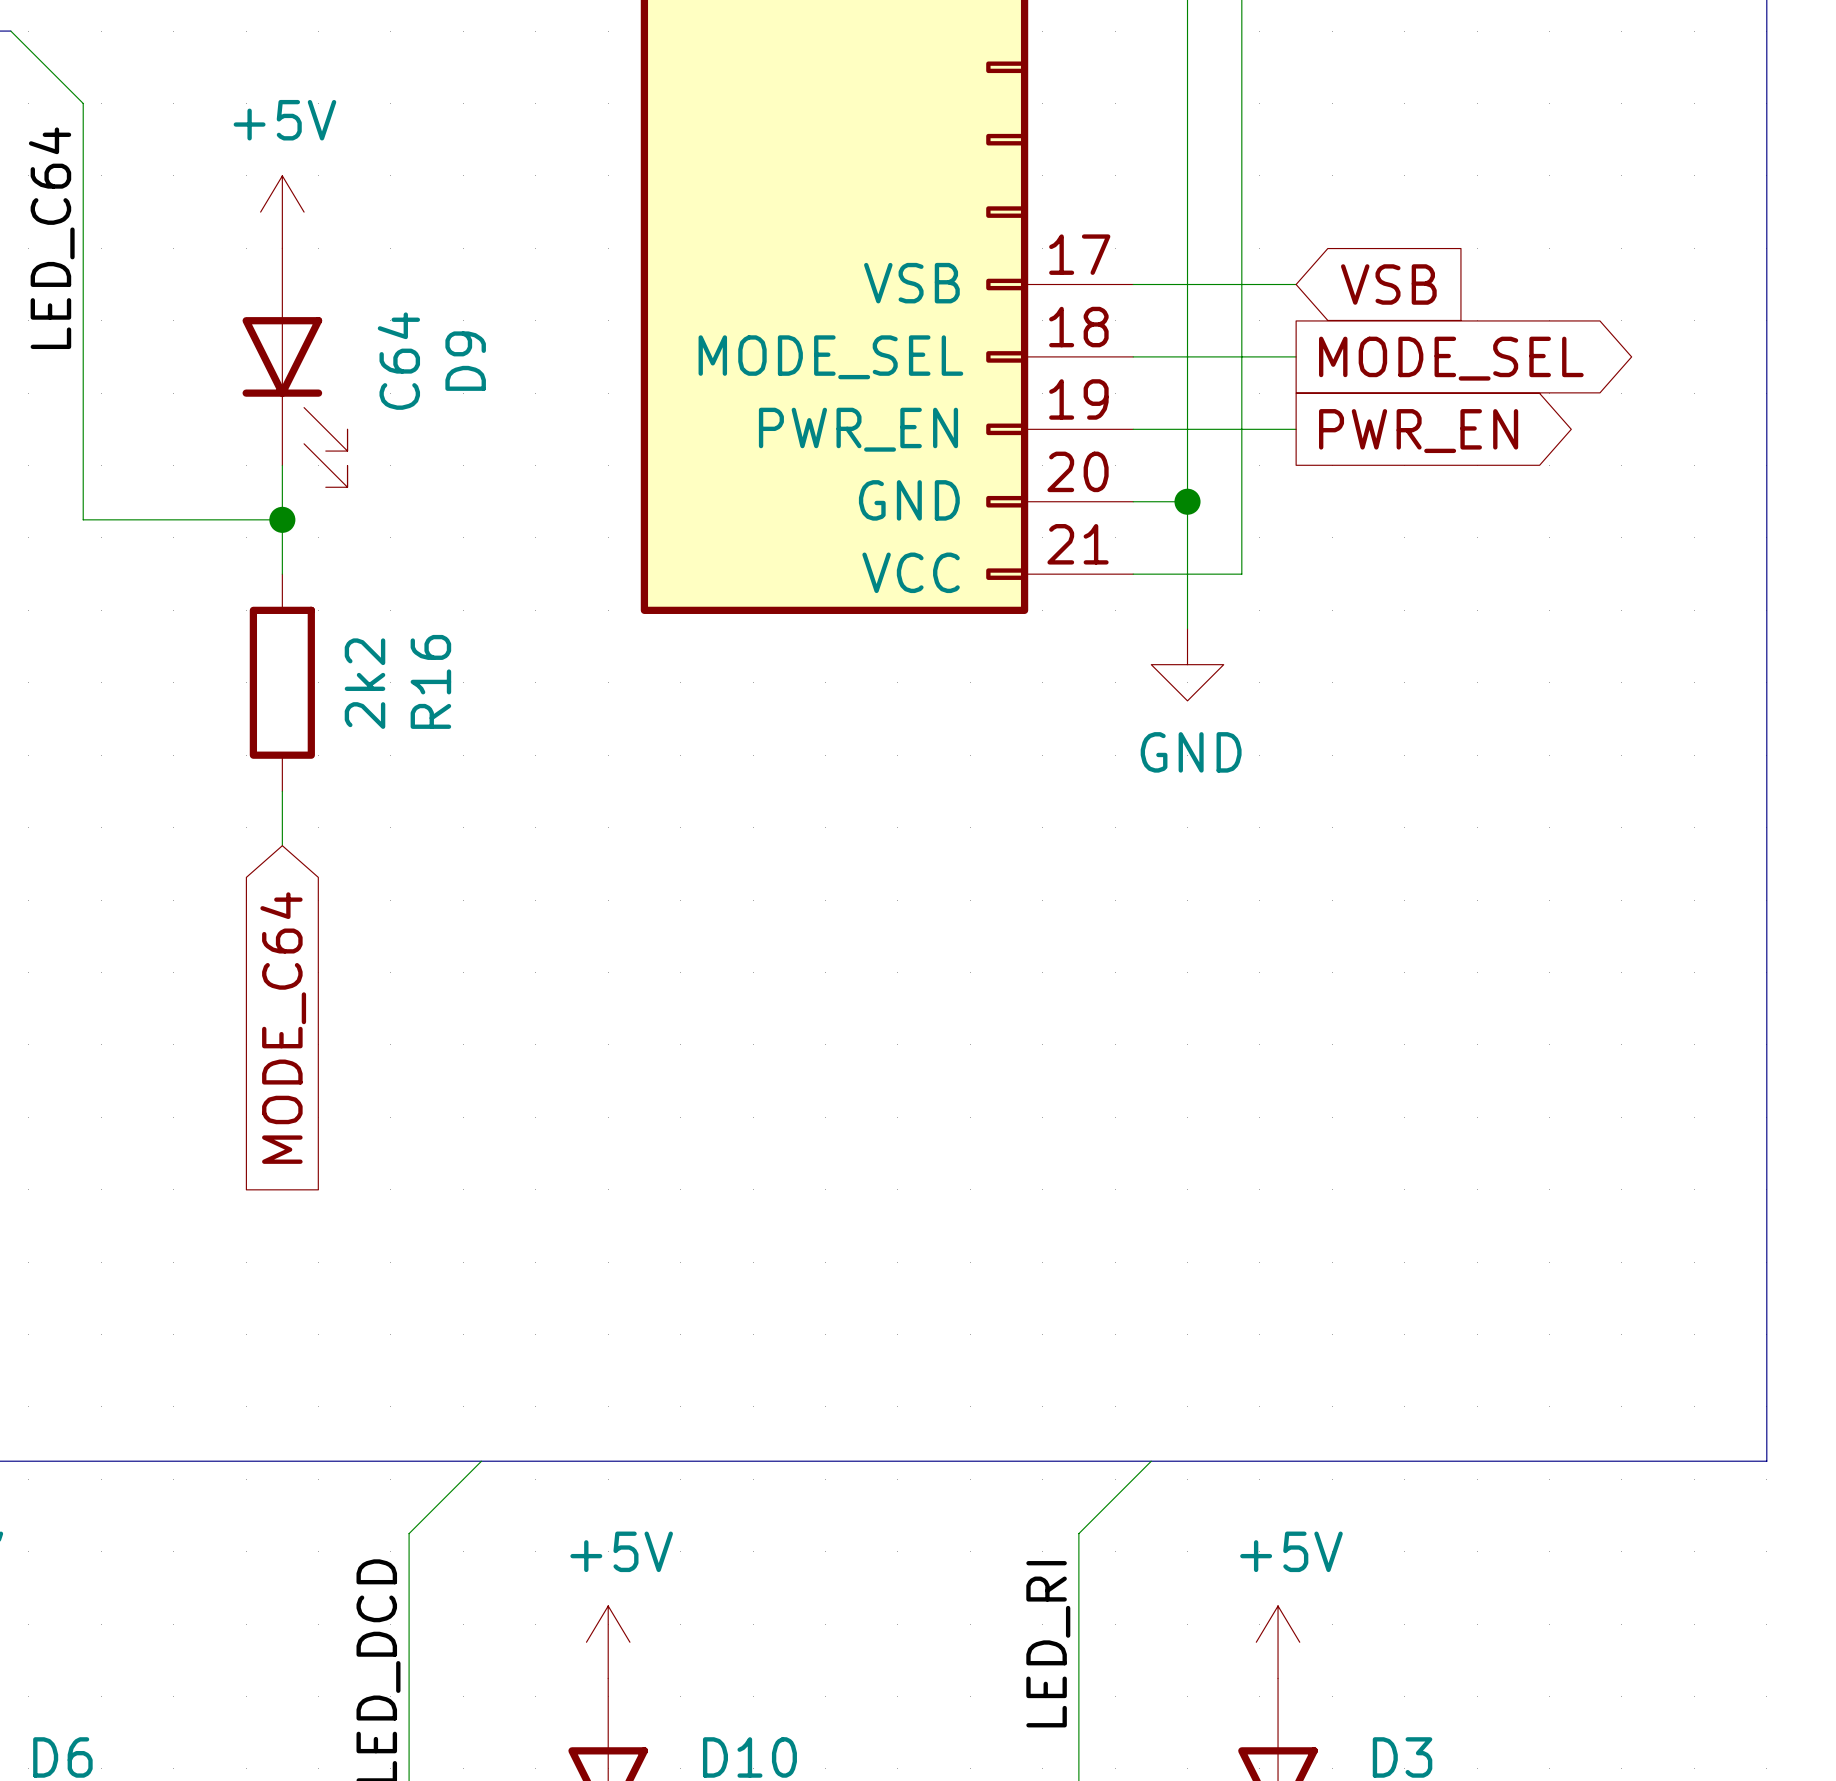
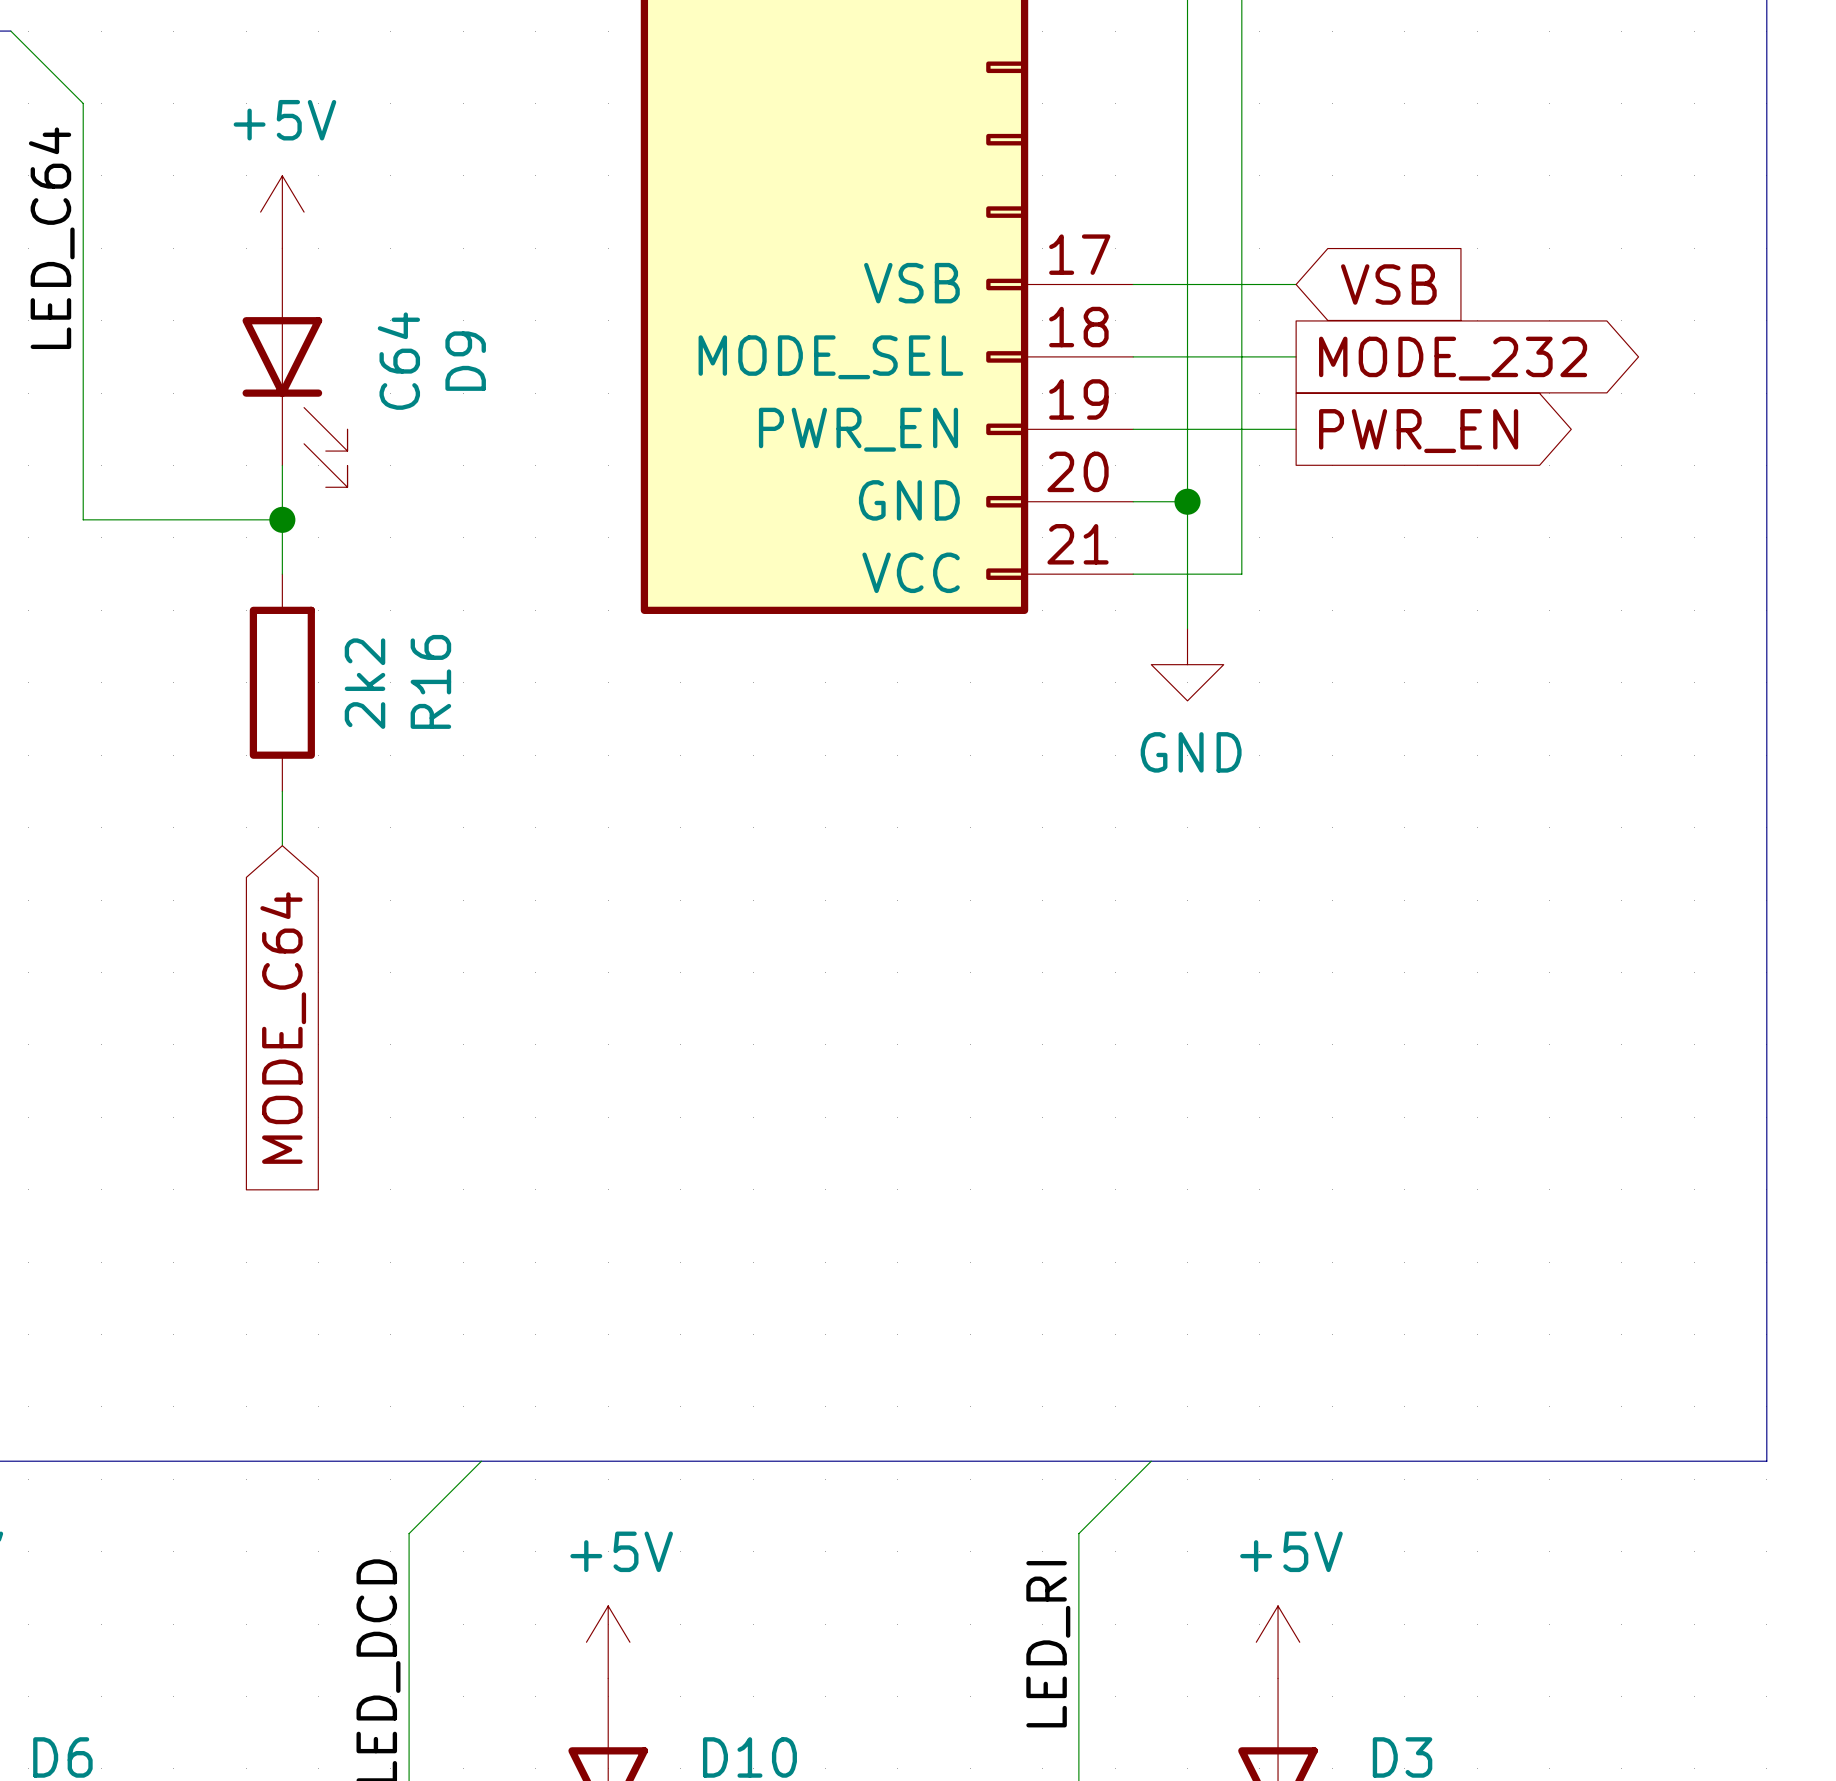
global label: MODE_SEL (1451, 358) -> MODE_232 (1453, 358)

